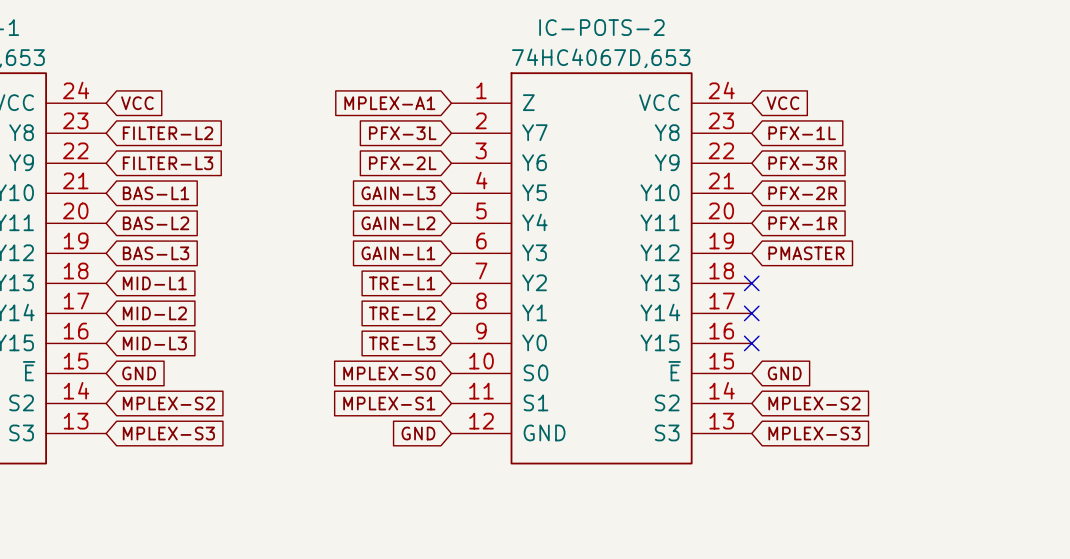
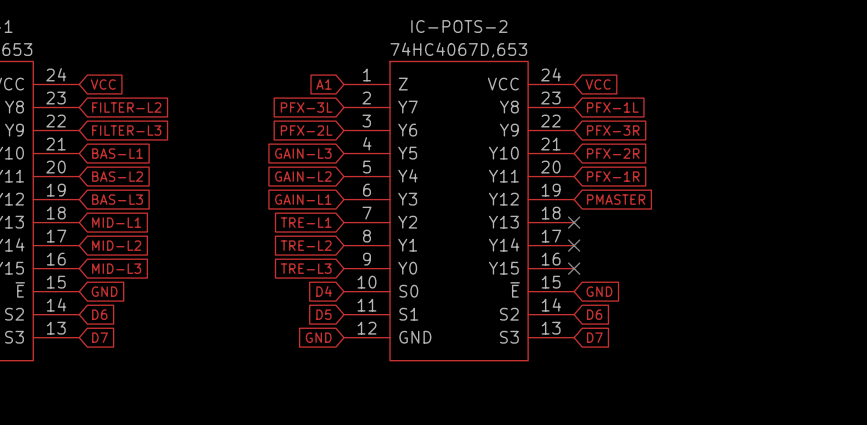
global label: MPLEX-A1 (389, 103) -> A1 (323, 84)
global label: MPLEX-S0 (389, 373) -> D4 (324, 291)
global label: MPLEX-S2 (168, 403) -> D6 (99, 314)
global label: MPLEX-S1 (389, 403) -> D5 (323, 314)
global label: MPLEX-S2 (814, 403) -> D6 (594, 314)
global label: MPLEX-S3 (168, 433) -> D7 (99, 337)
global label: MPLEX-S3 (814, 433) -> D7 (594, 337)

